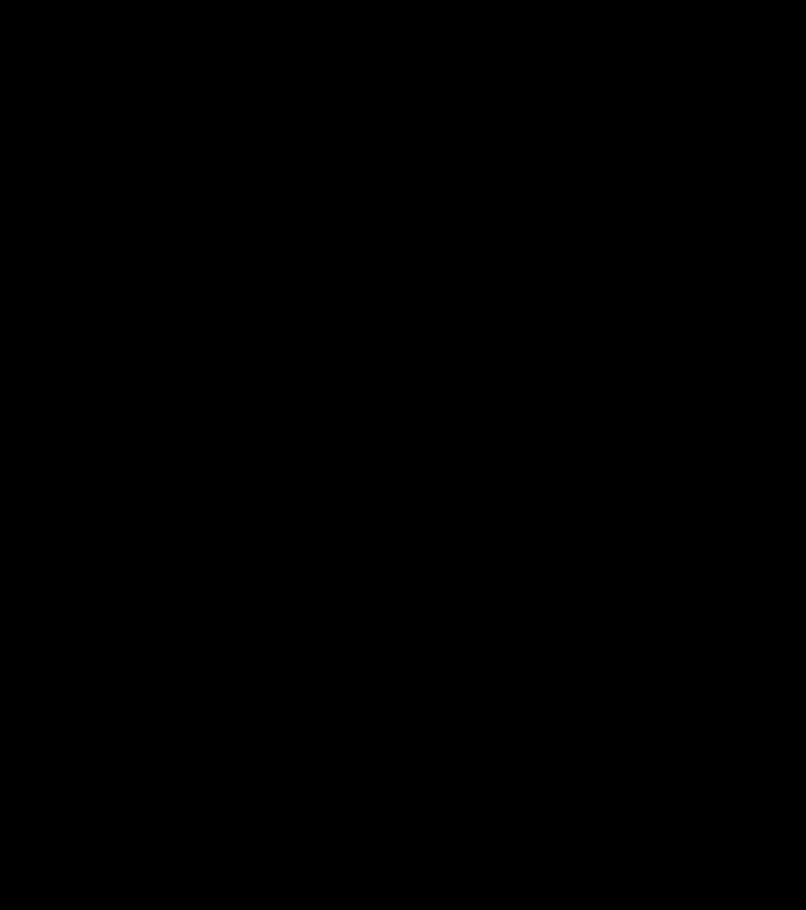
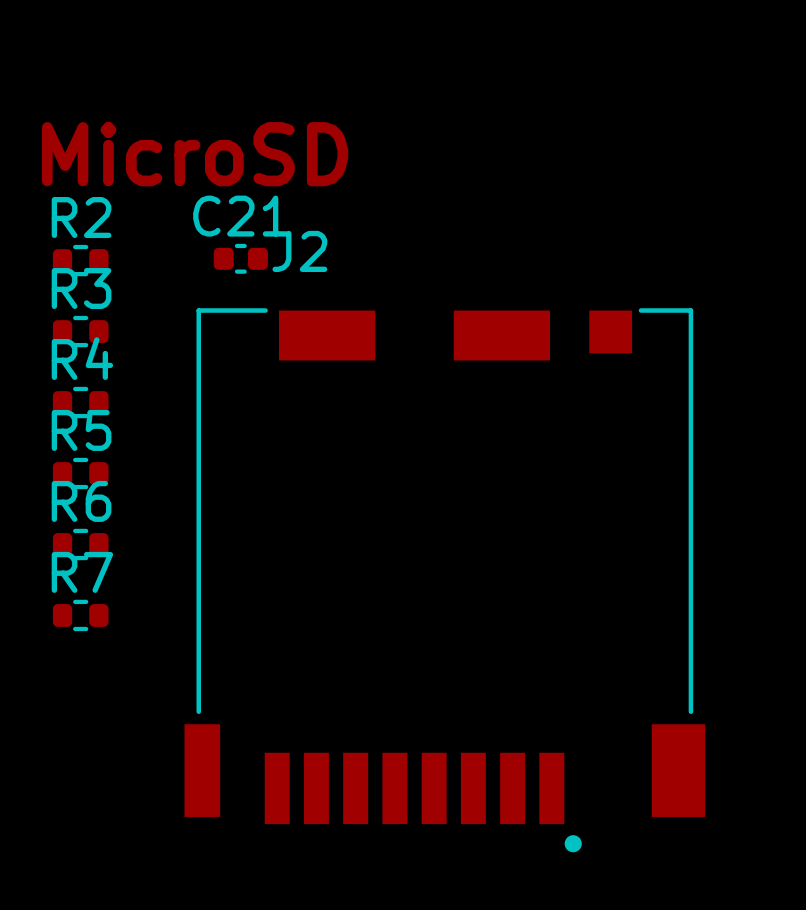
text: none -> MicroSD (195, 154)
C21: none -> (240, 258)
R2: none -> (80, 260)
R3: none -> (80, 331)
R4: none -> (80, 402)
R5: none -> (80, 473)
R6: none -> (80, 544)
J2: none -> (444, 580)
R7: none -> (80, 615)

